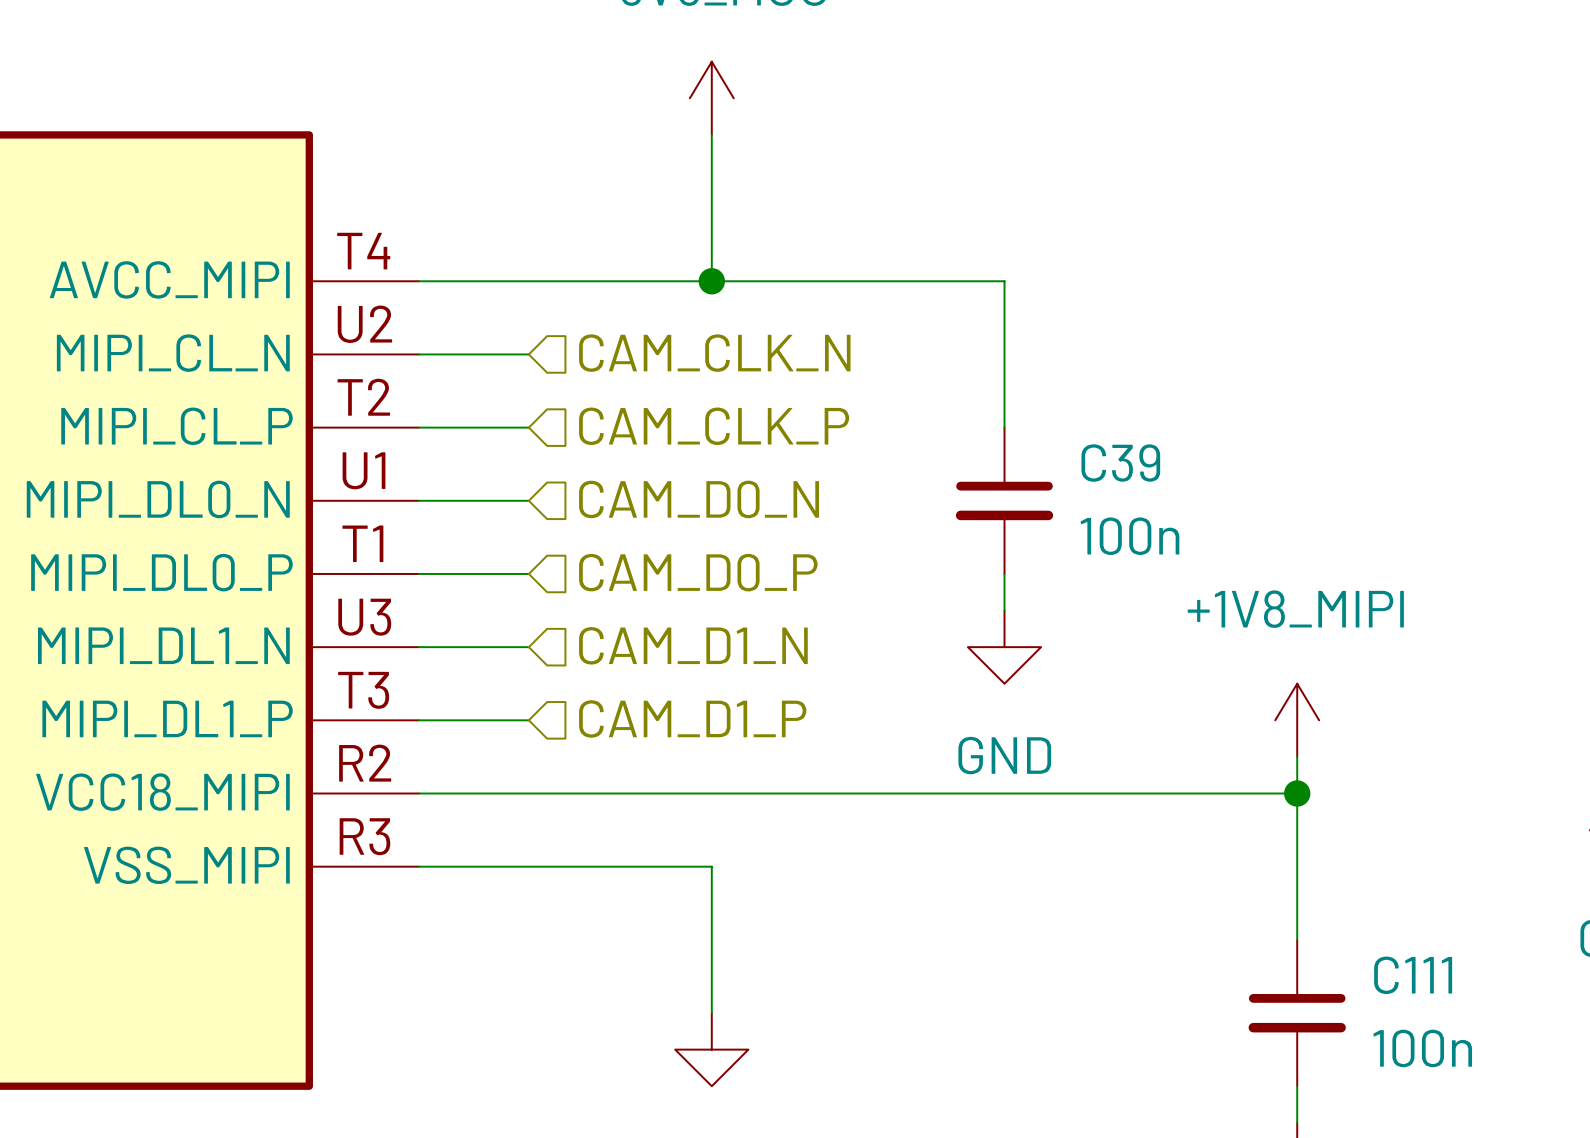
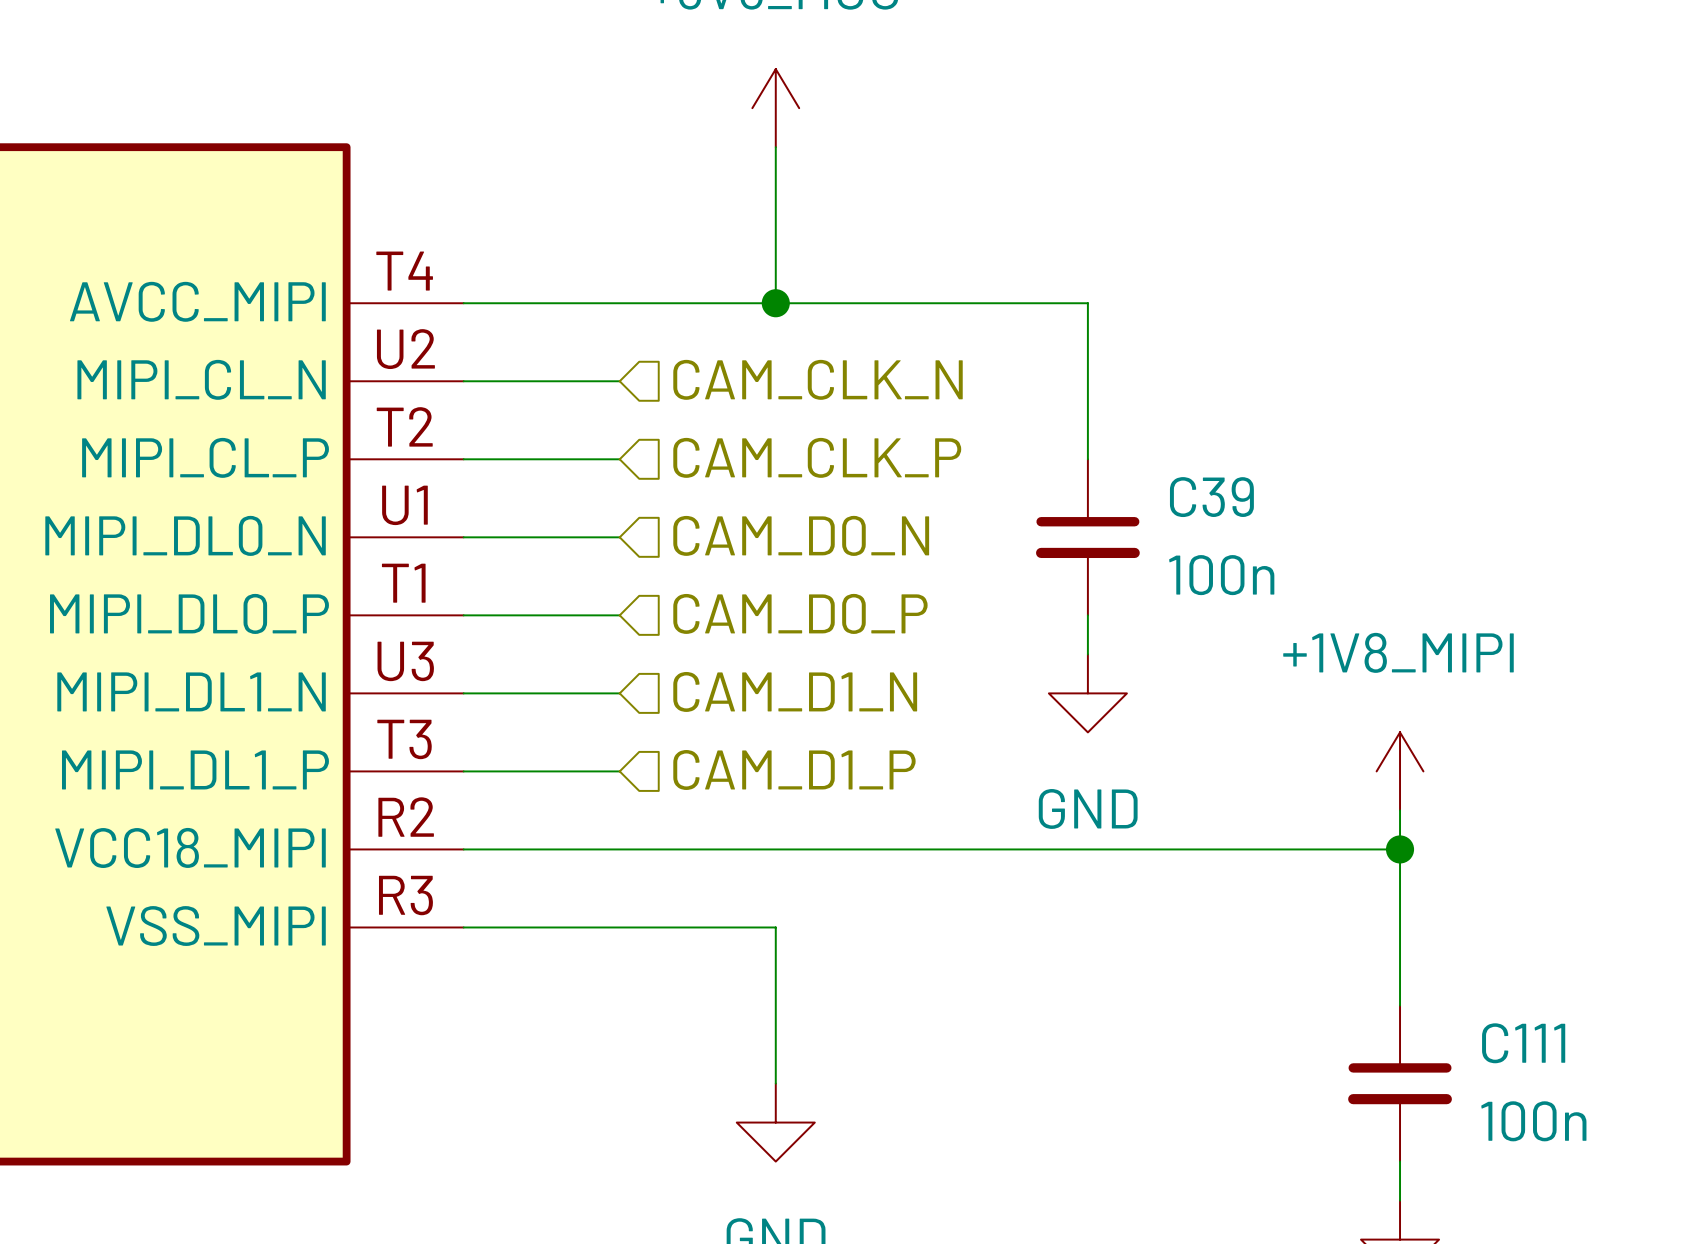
hierarchical label position: CAM_CLK_N (714, 353) -> CAM_CLK_N (818, 379)
wire: none -> (580, 381) (619, 381)
hierarchical label position: CAM_CLK_P (714, 426) -> CAM_CLK_P (817, 457)
wire: none -> (580, 459) (619, 459)
hierarchical label position: CAM_D0_N (699, 499) -> CAM_D0_N (801, 535)
wire: none -> (580, 537) (619, 537)
hierarchical label position: CAM_D0_P (698, 572) -> CAM_D0_P (800, 613)
wire: none -> (580, 615) (619, 615)
hierarchical label position: CAM_D1_N (693, 645) -> CAM_D1_N (795, 691)
wire: none -> (580, 693) (619, 693)
hierarchical label position: CAM_D1_P (692, 718) -> CAM_D1_P (794, 769)
wire: none -> (580, 771) (619, 771)

